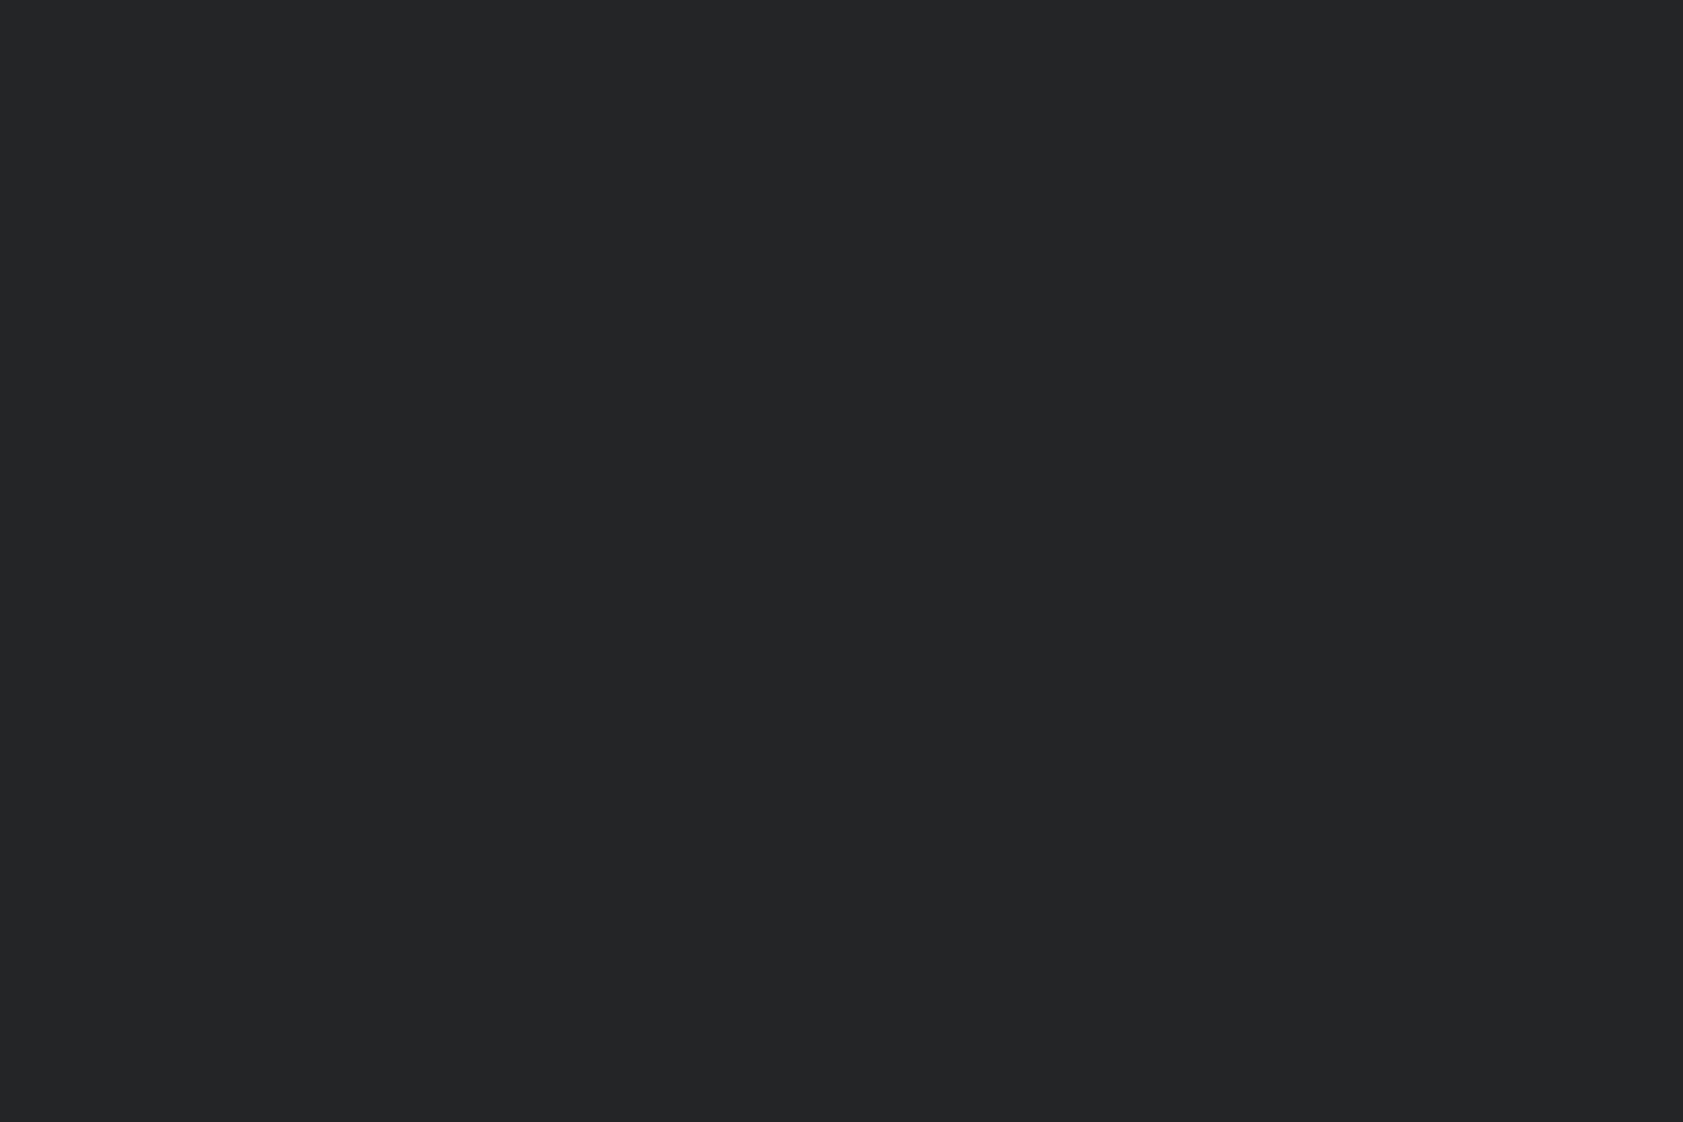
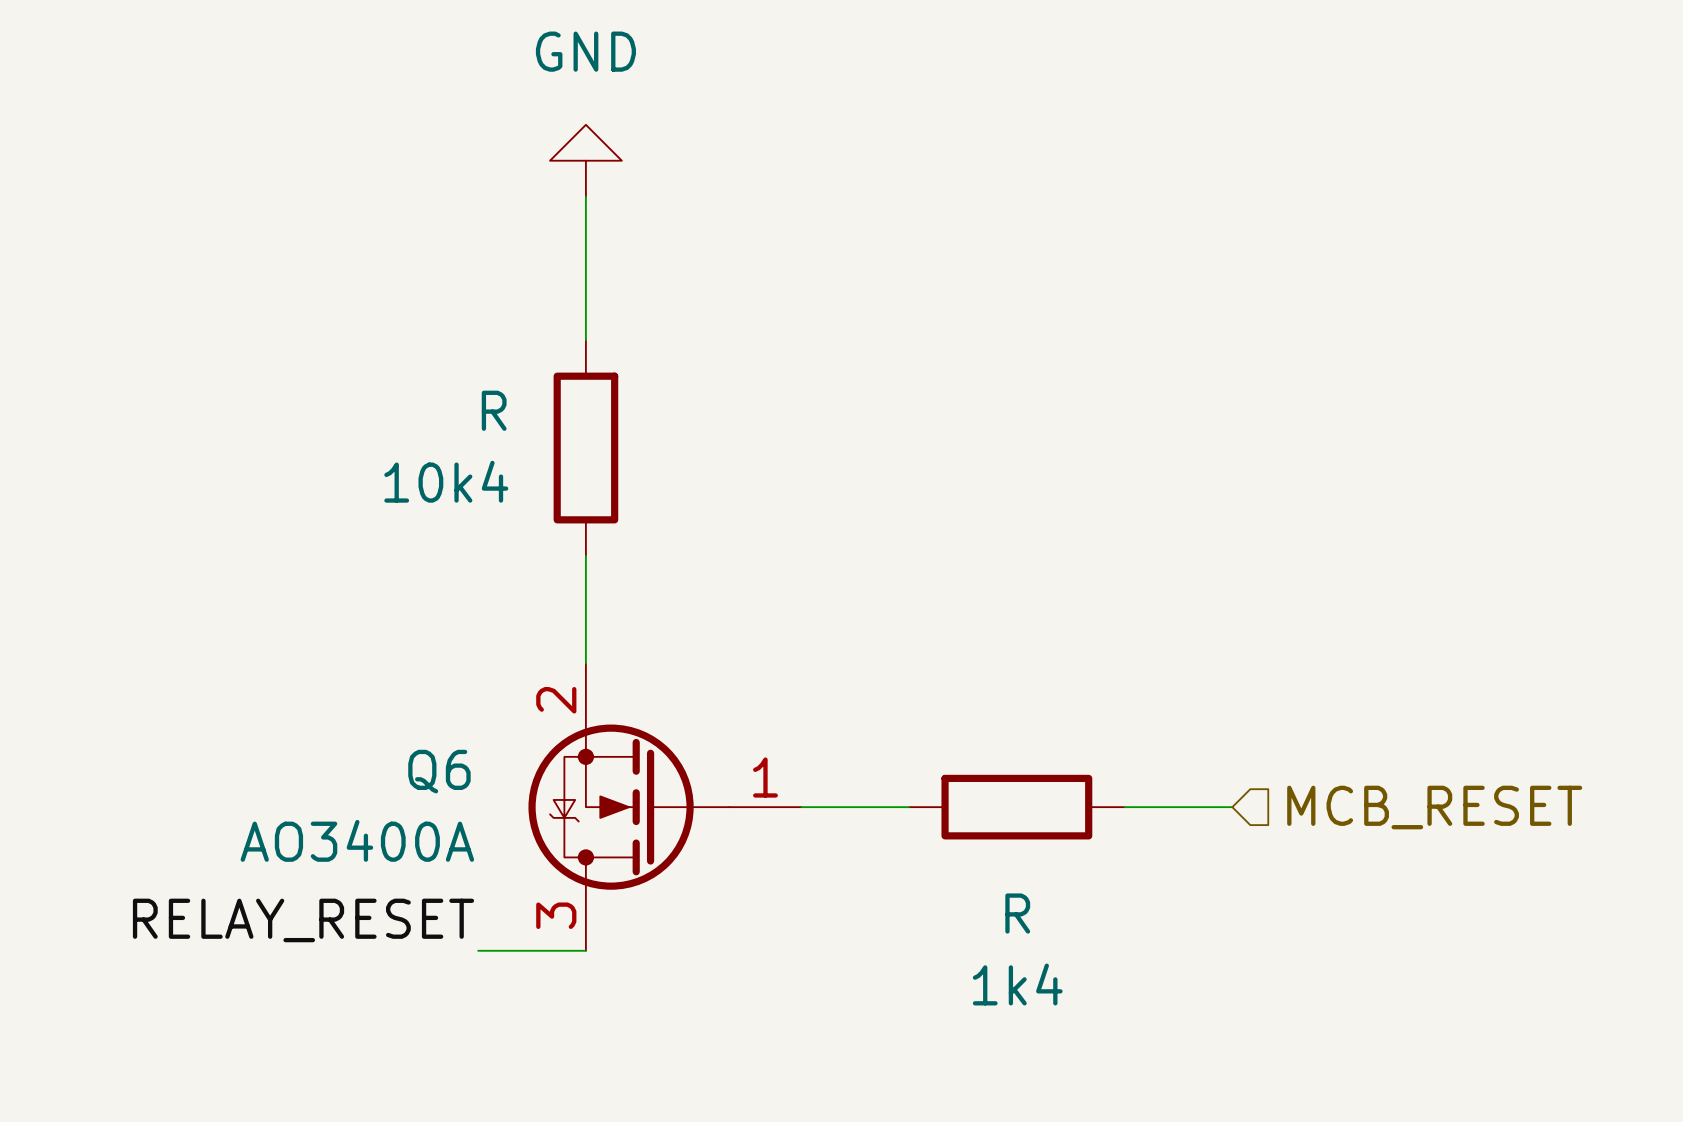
power symbol: none -> GND (585, 160)
wire: none -> (585, 196) (585, 340)
10k4: none -> R (585, 448)
wire: none -> (585, 555) (585, 663)
Q6: none -> AO3400A (664, 807)
wire: none -> (801, 807) (909, 807)
1k4: none -> R (1016, 807)
wire: none -> (1124, 807) (1232, 807)
hierarchical label: none -> MCB_RESET (1434, 807)
label: none -> RELAY_RESET (303, 920)
wire: none -> (478, 950) (585, 950)

